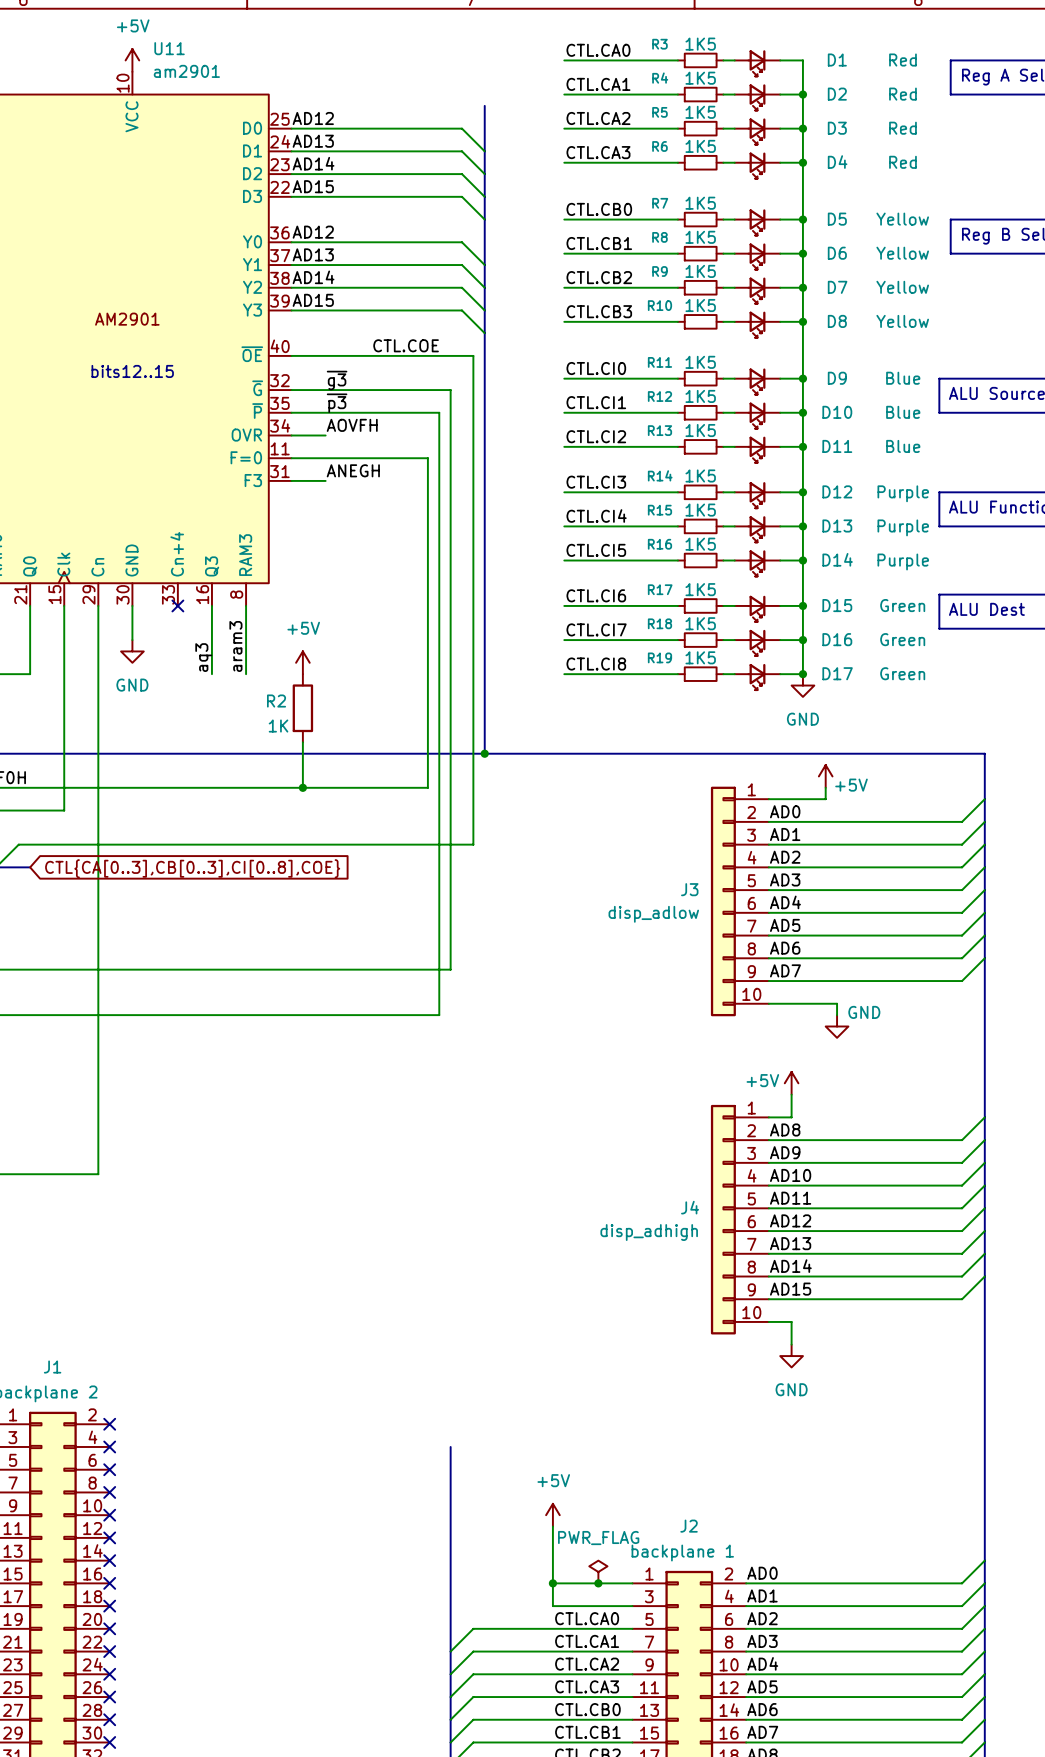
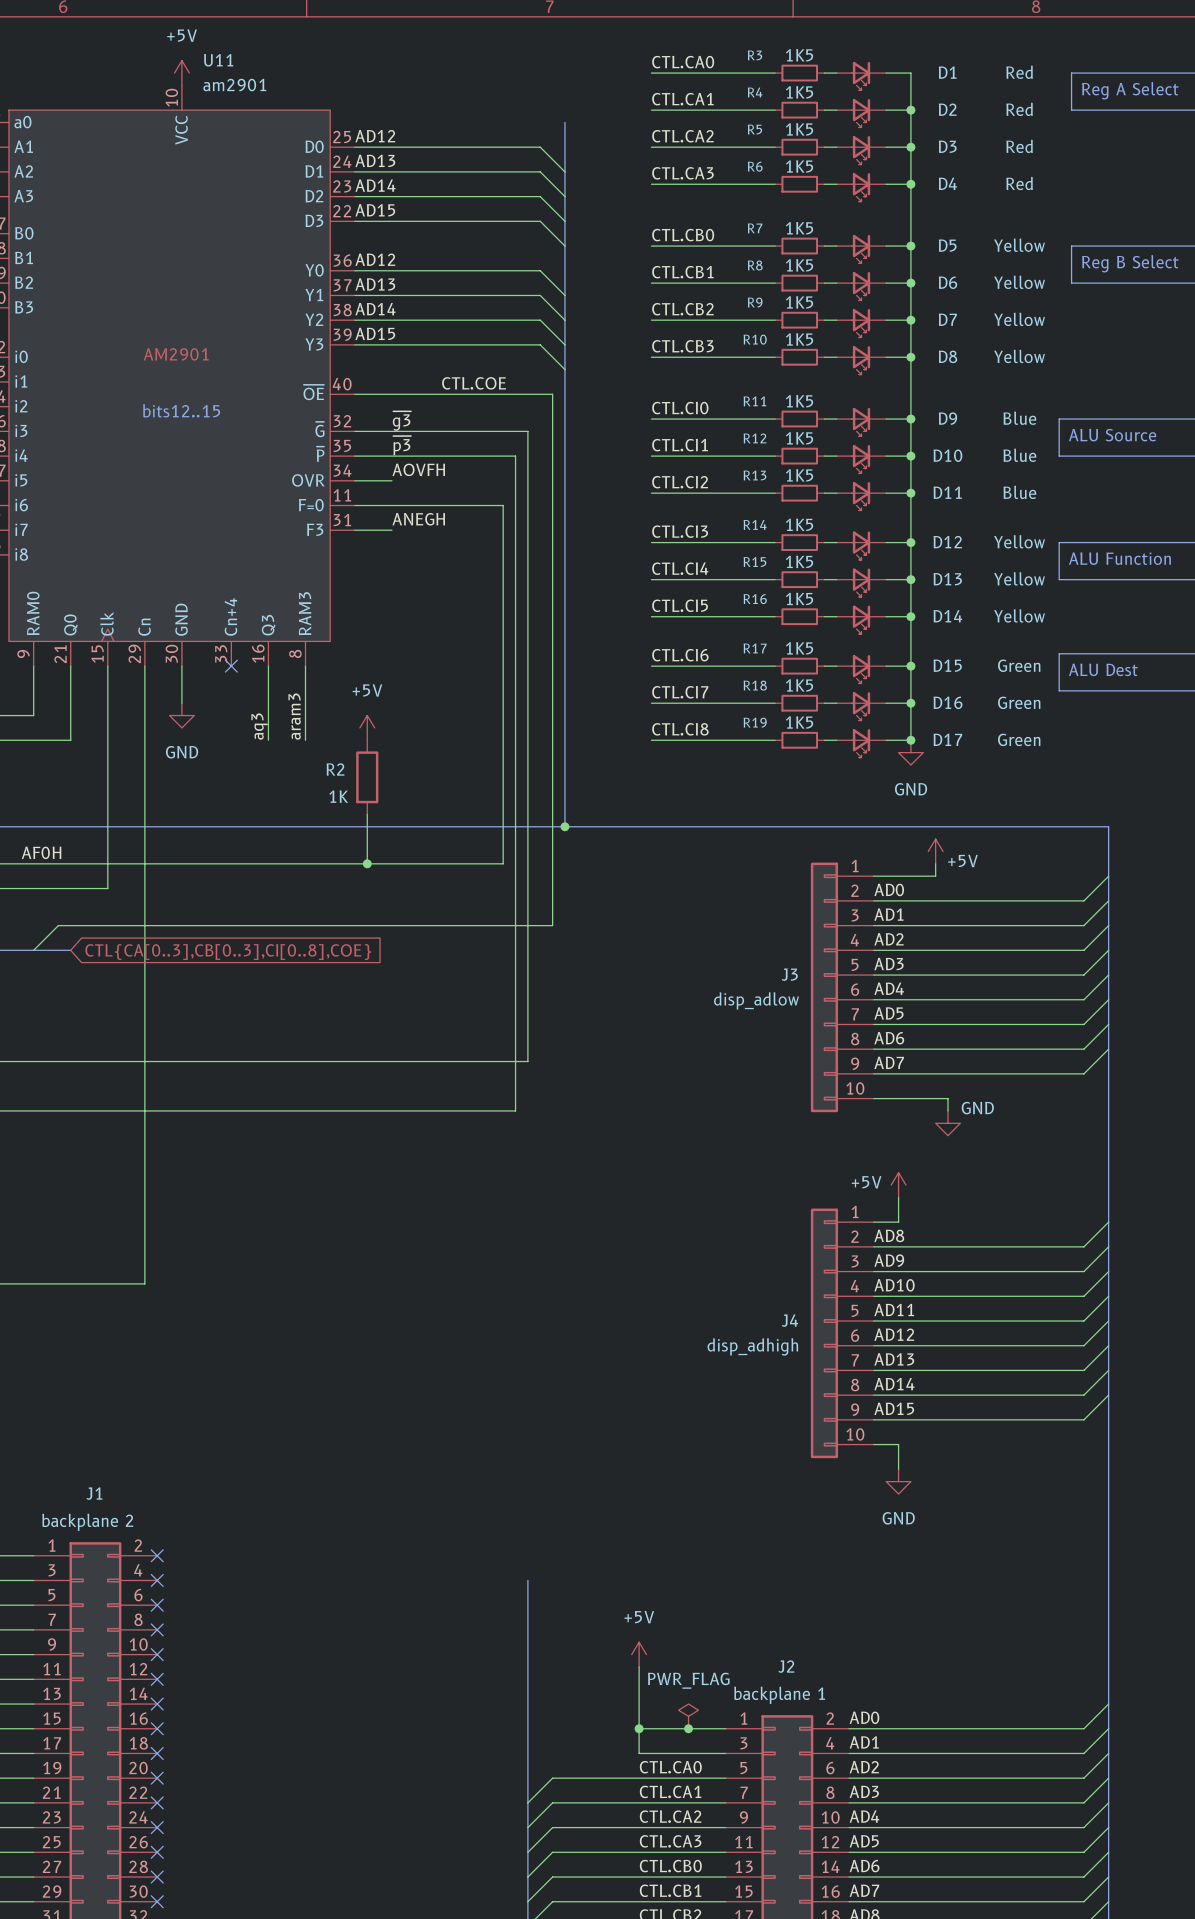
D12 value: Purple (903, 493) -> Yellow (1019, 541)
D13 value: Purple (903, 527) -> Yellow (1019, 578)
D14 value: Purple (903, 561) -> Yellow (1019, 615)

